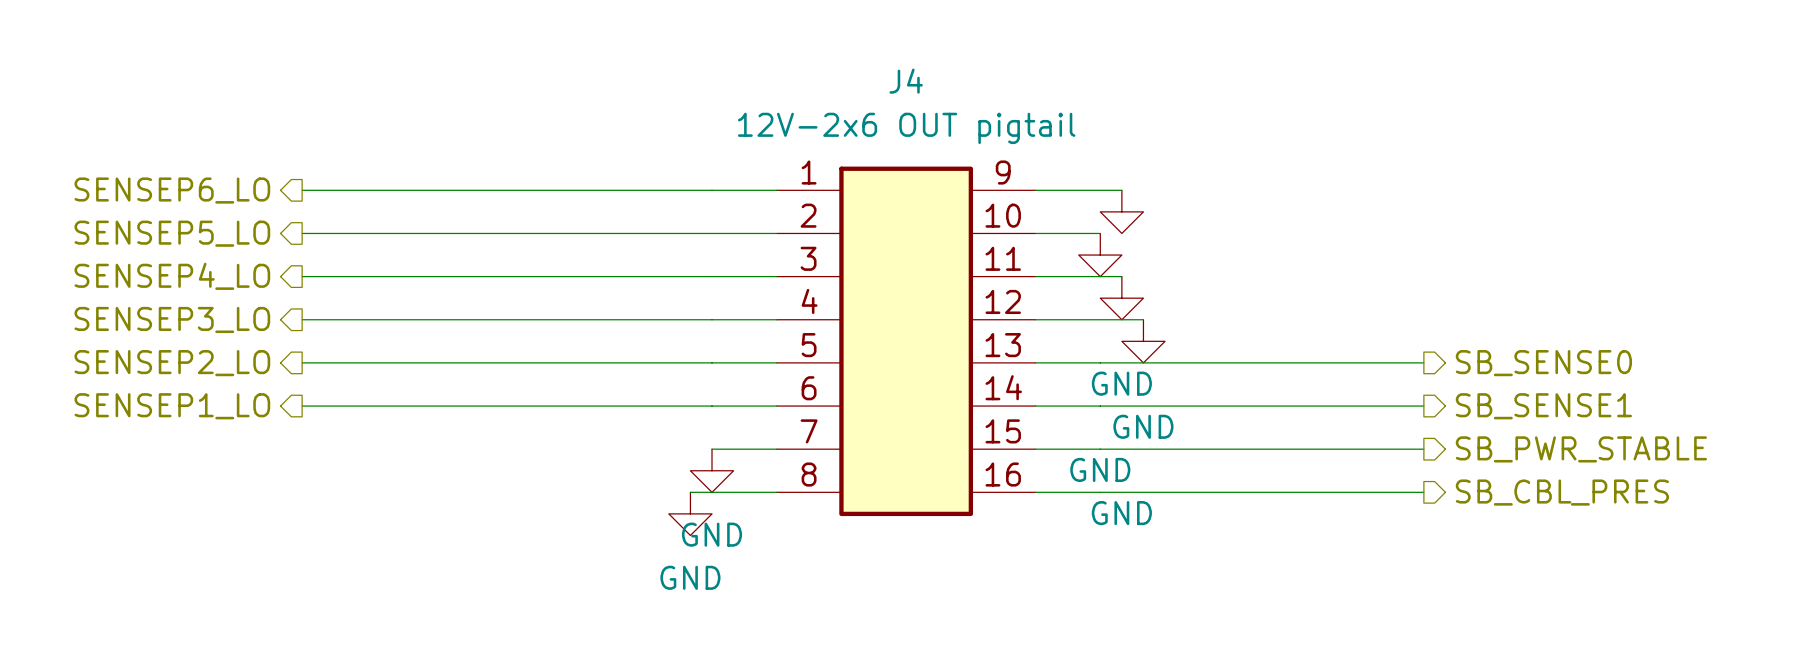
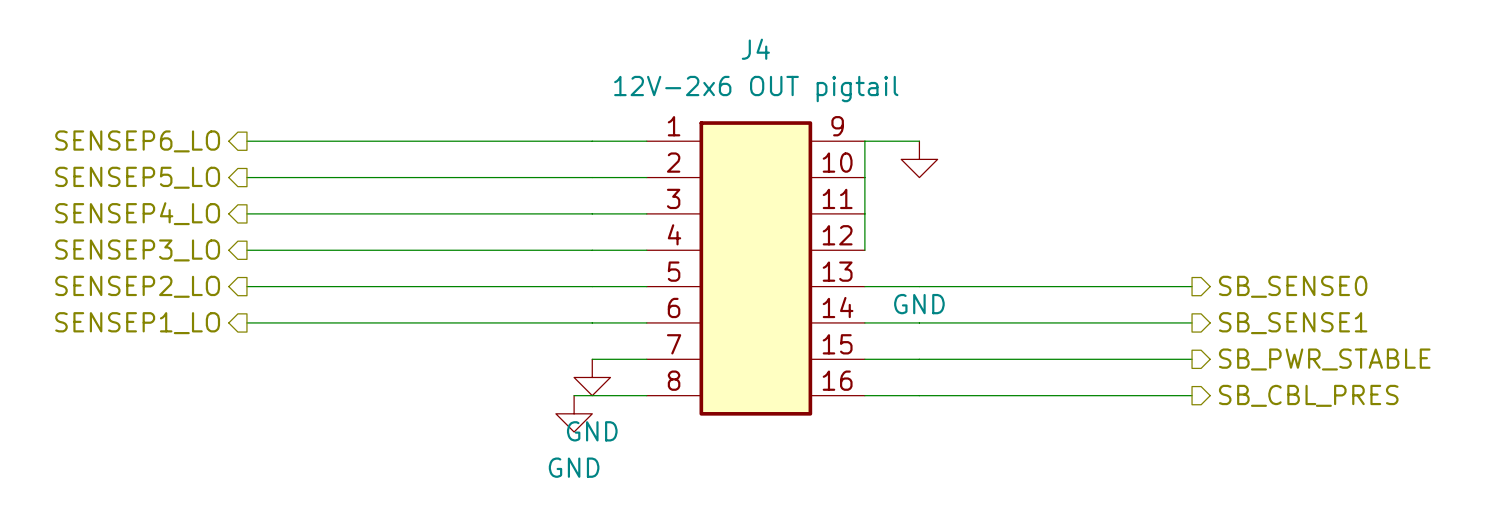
wire: (1100, 190) (1121, 190) -> none
power symbol: none -> GND (919, 159)
power symbol: GND (1121, 211) -> none
wire: (1035, 233) (1100, 233) -> none
power symbol: GND (1100, 255) -> none
wire: (1035, 276) (1121, 276) -> none
power symbol: GND (1121, 298) -> none
wire: (1035, 319) (1143, 319) -> (864, 250) (864, 141)
power symbol: GND (1143, 341) -> none

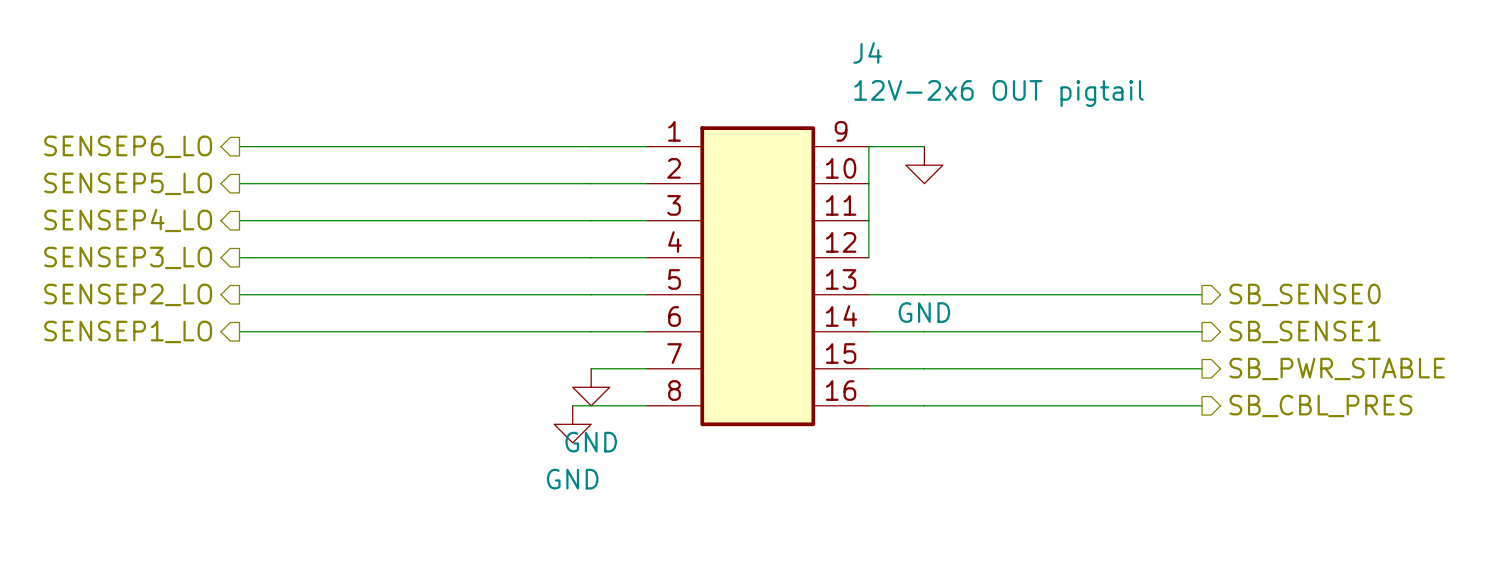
J4 name position: J4 (755, 49) -> J4 (867, 52)
J4 value position: 12V-2x6 OUT pigtail (756, 89) -> 12V-2x6 OUT pigtail (999, 93)

